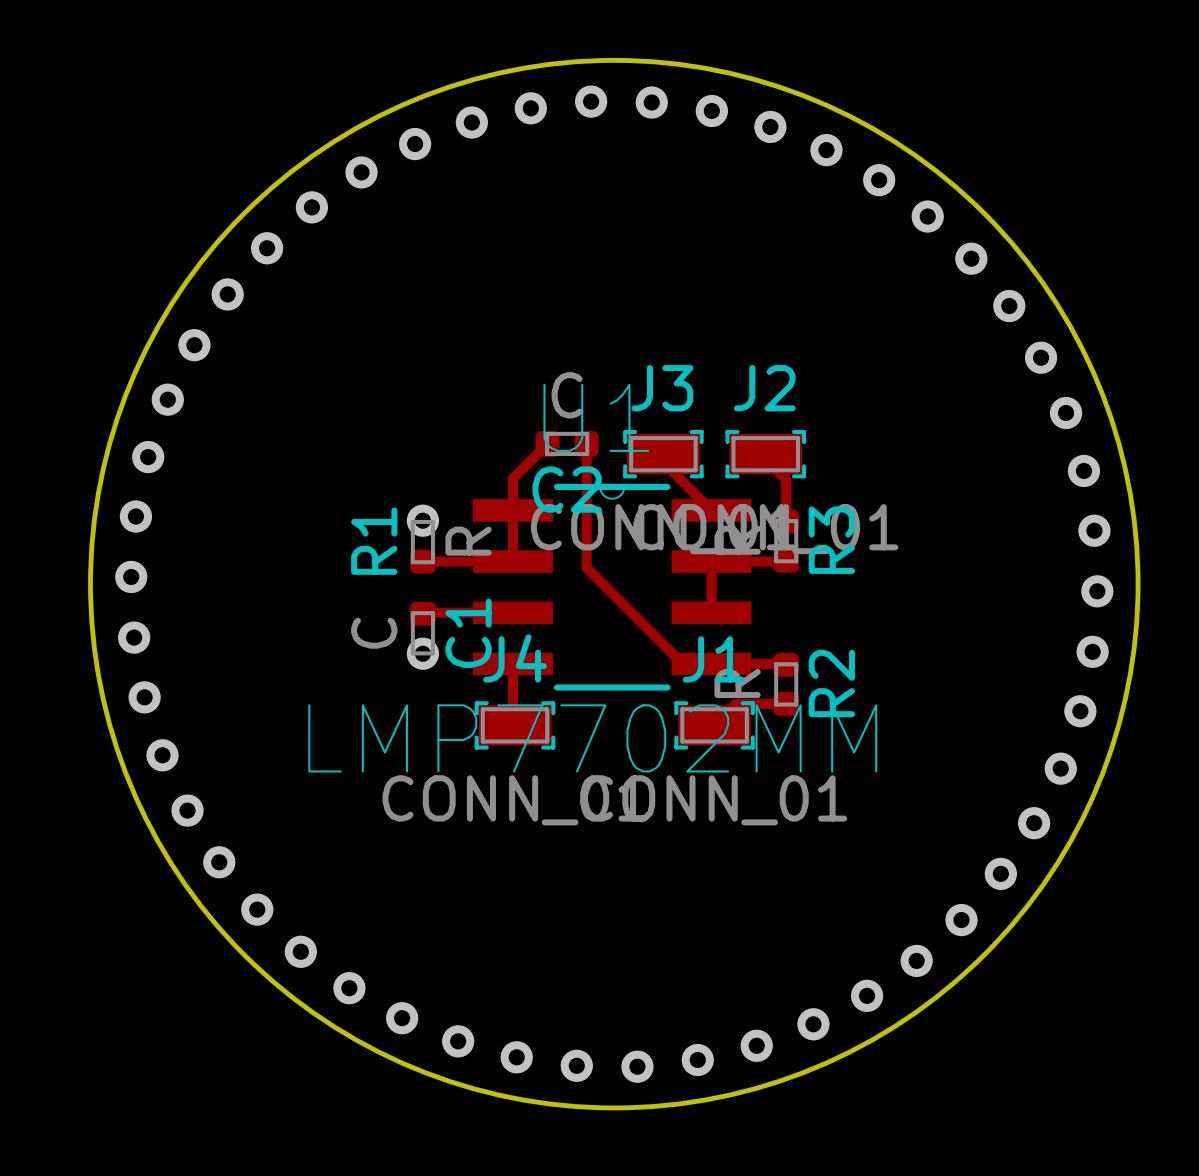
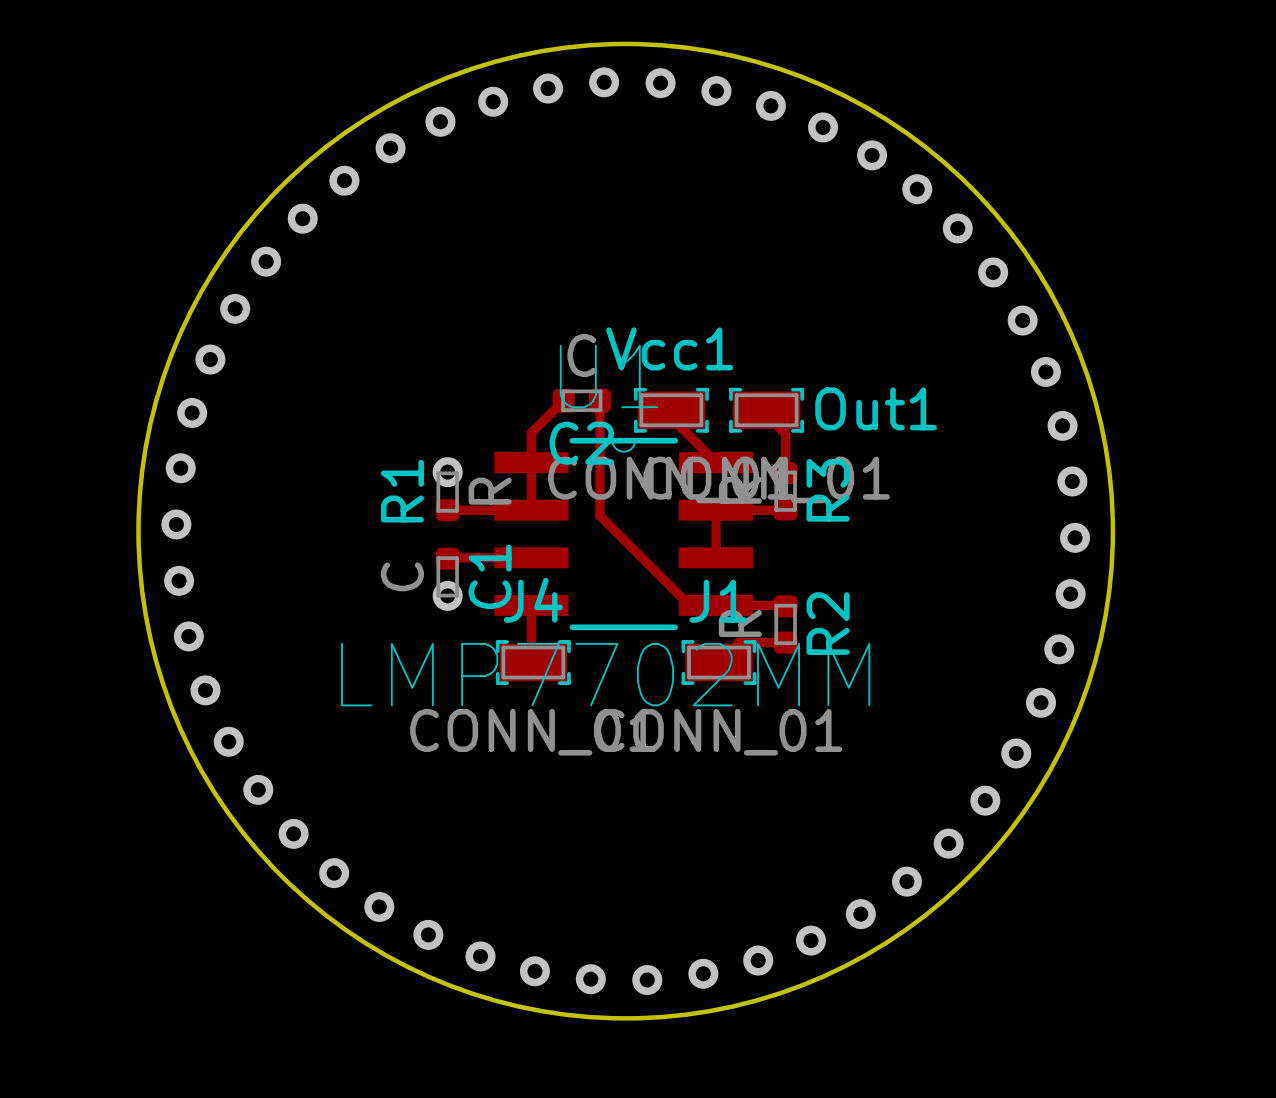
J3 name: J3 (662, 388) -> Vcc1 (669, 348)
J2 name: J2 (764, 388) -> Out1 (876, 408)

